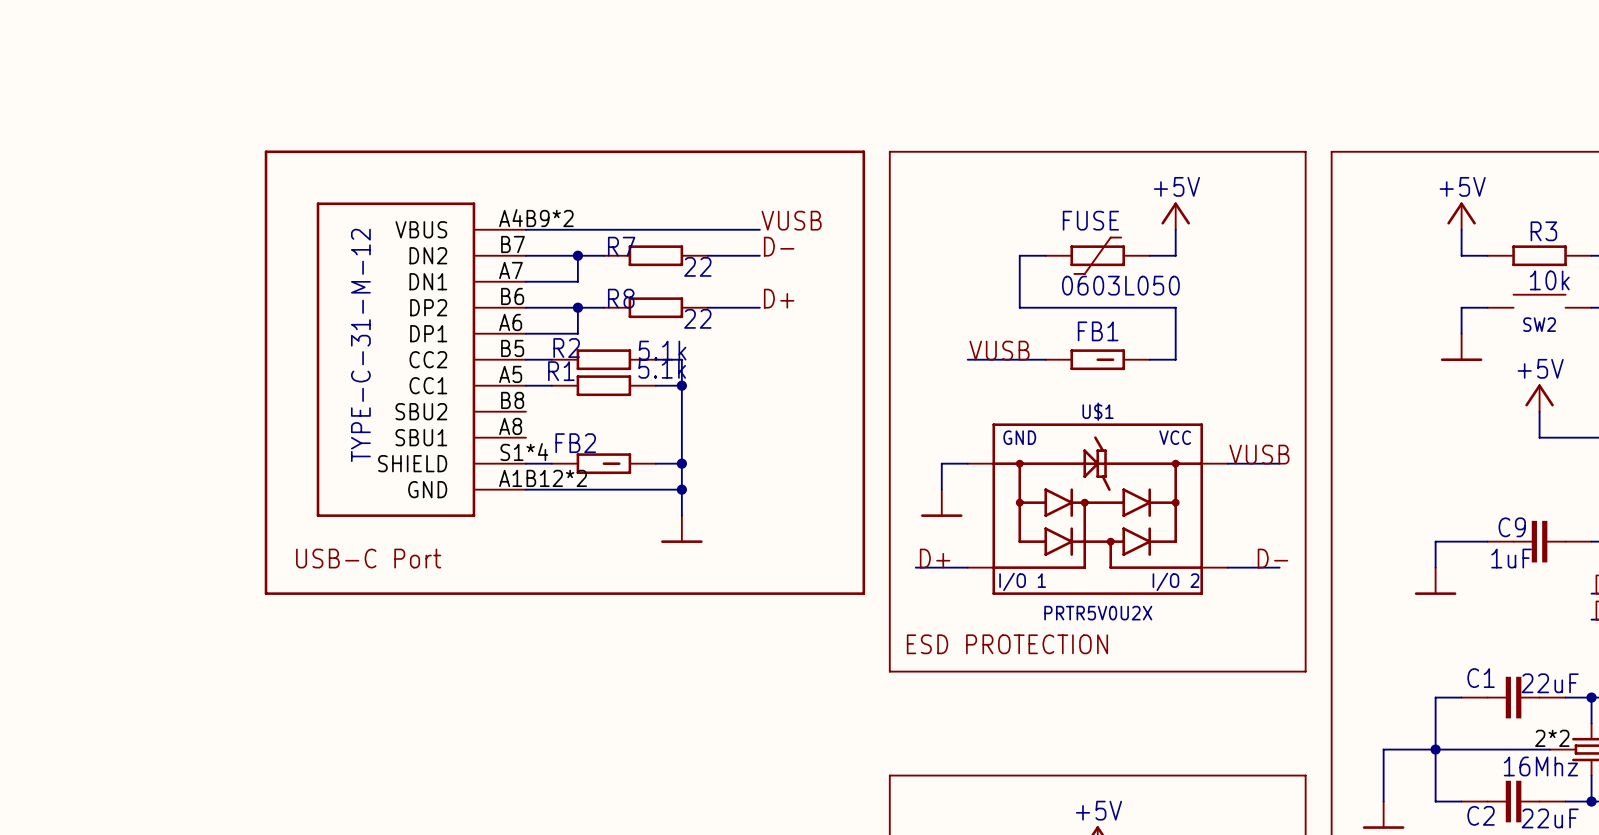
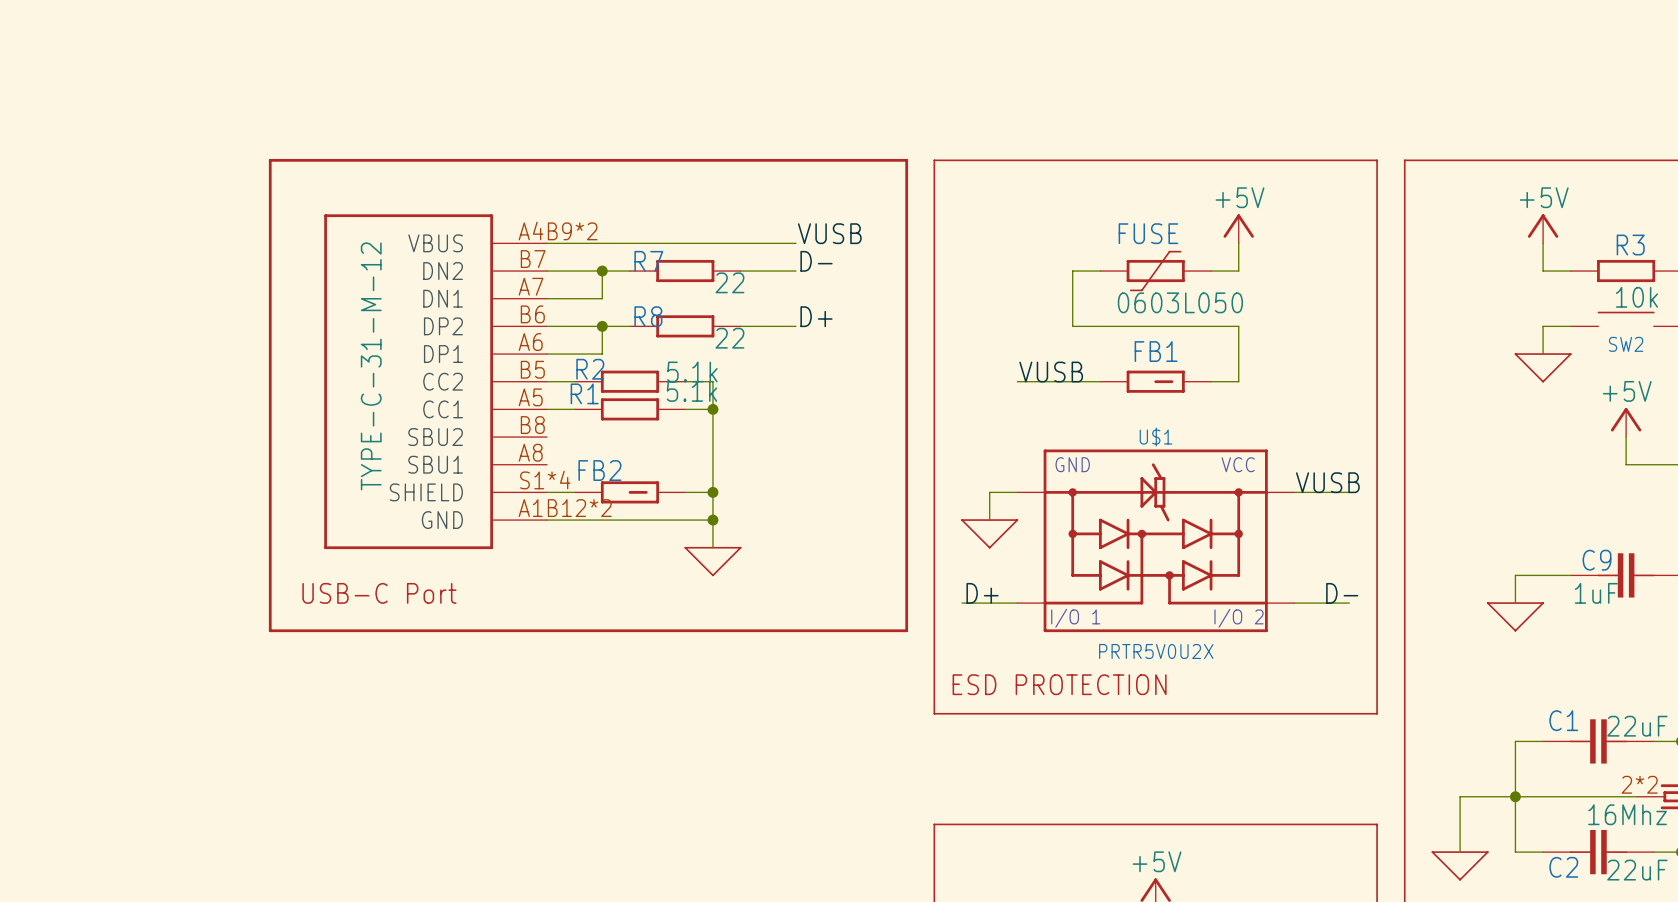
power symbol shape: [1440, 333, 1483, 362] -> [1514, 353, 1572, 383]
power symbol shape: [920, 489, 963, 517] -> [961, 519, 1019, 549]
power symbol shape: [661, 515, 703, 543] -> [684, 546, 742, 577]
power symbol shape: [1414, 567, 1457, 595] -> [1486, 602, 1544, 632]
power symbol shape: [1362, 801, 1405, 829] -> [1431, 851, 1489, 881]

